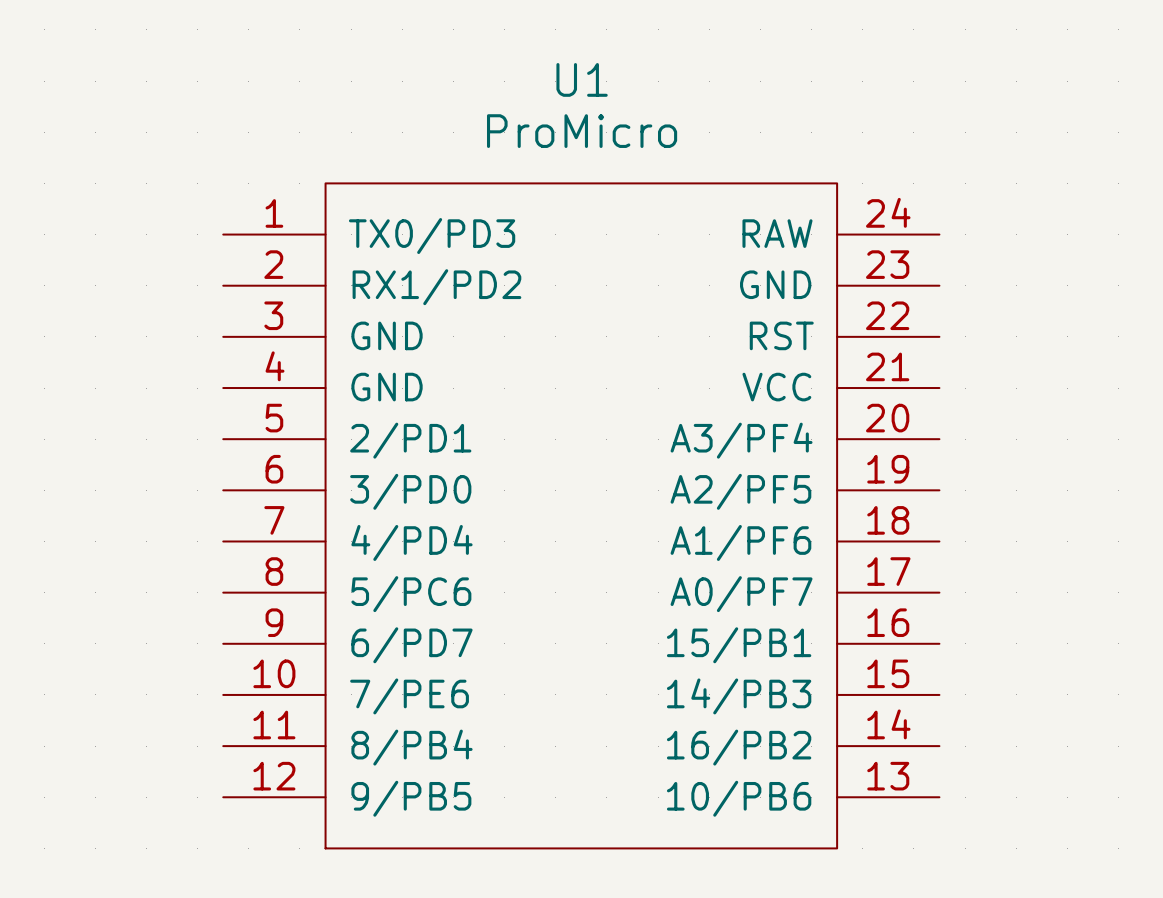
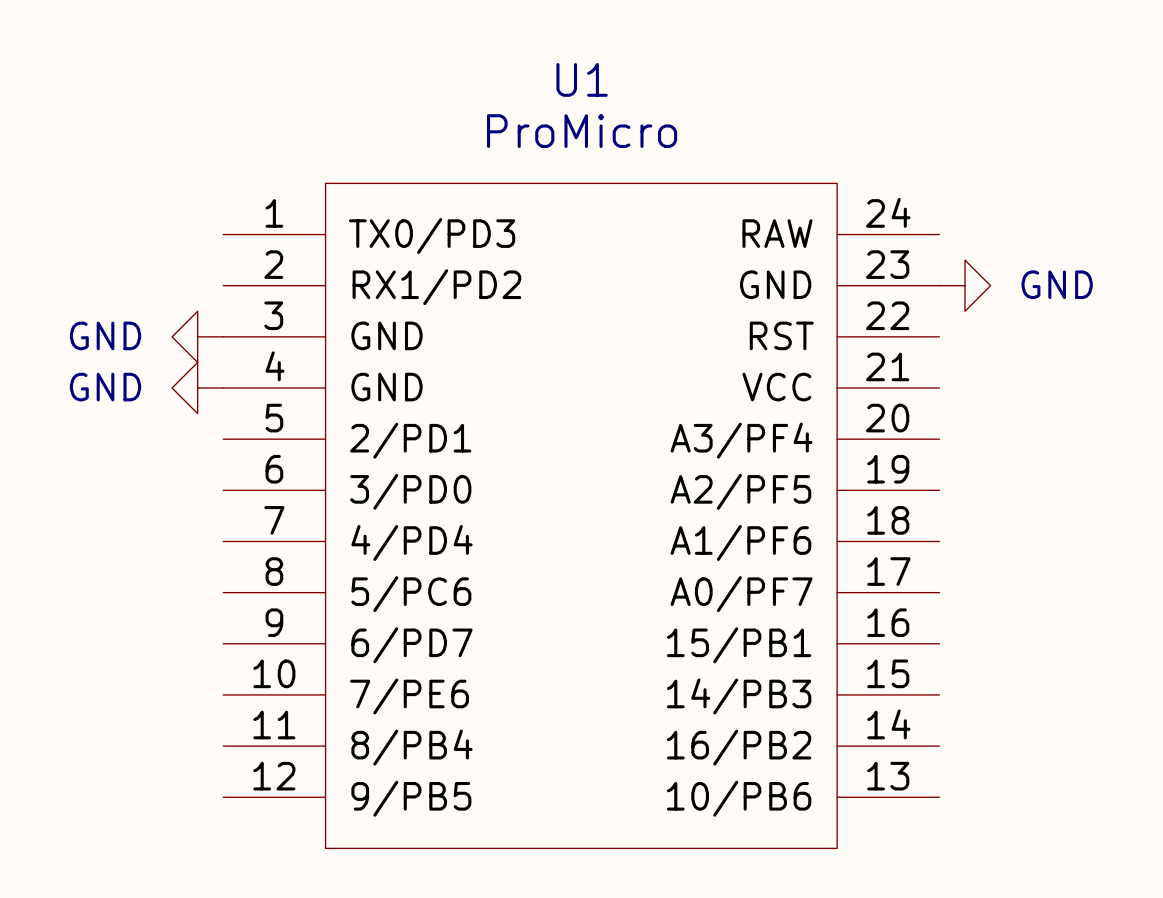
power symbol: none -> GND (965, 285)
power symbol: none -> GND (197, 336)
power symbol: none -> GND (197, 388)

